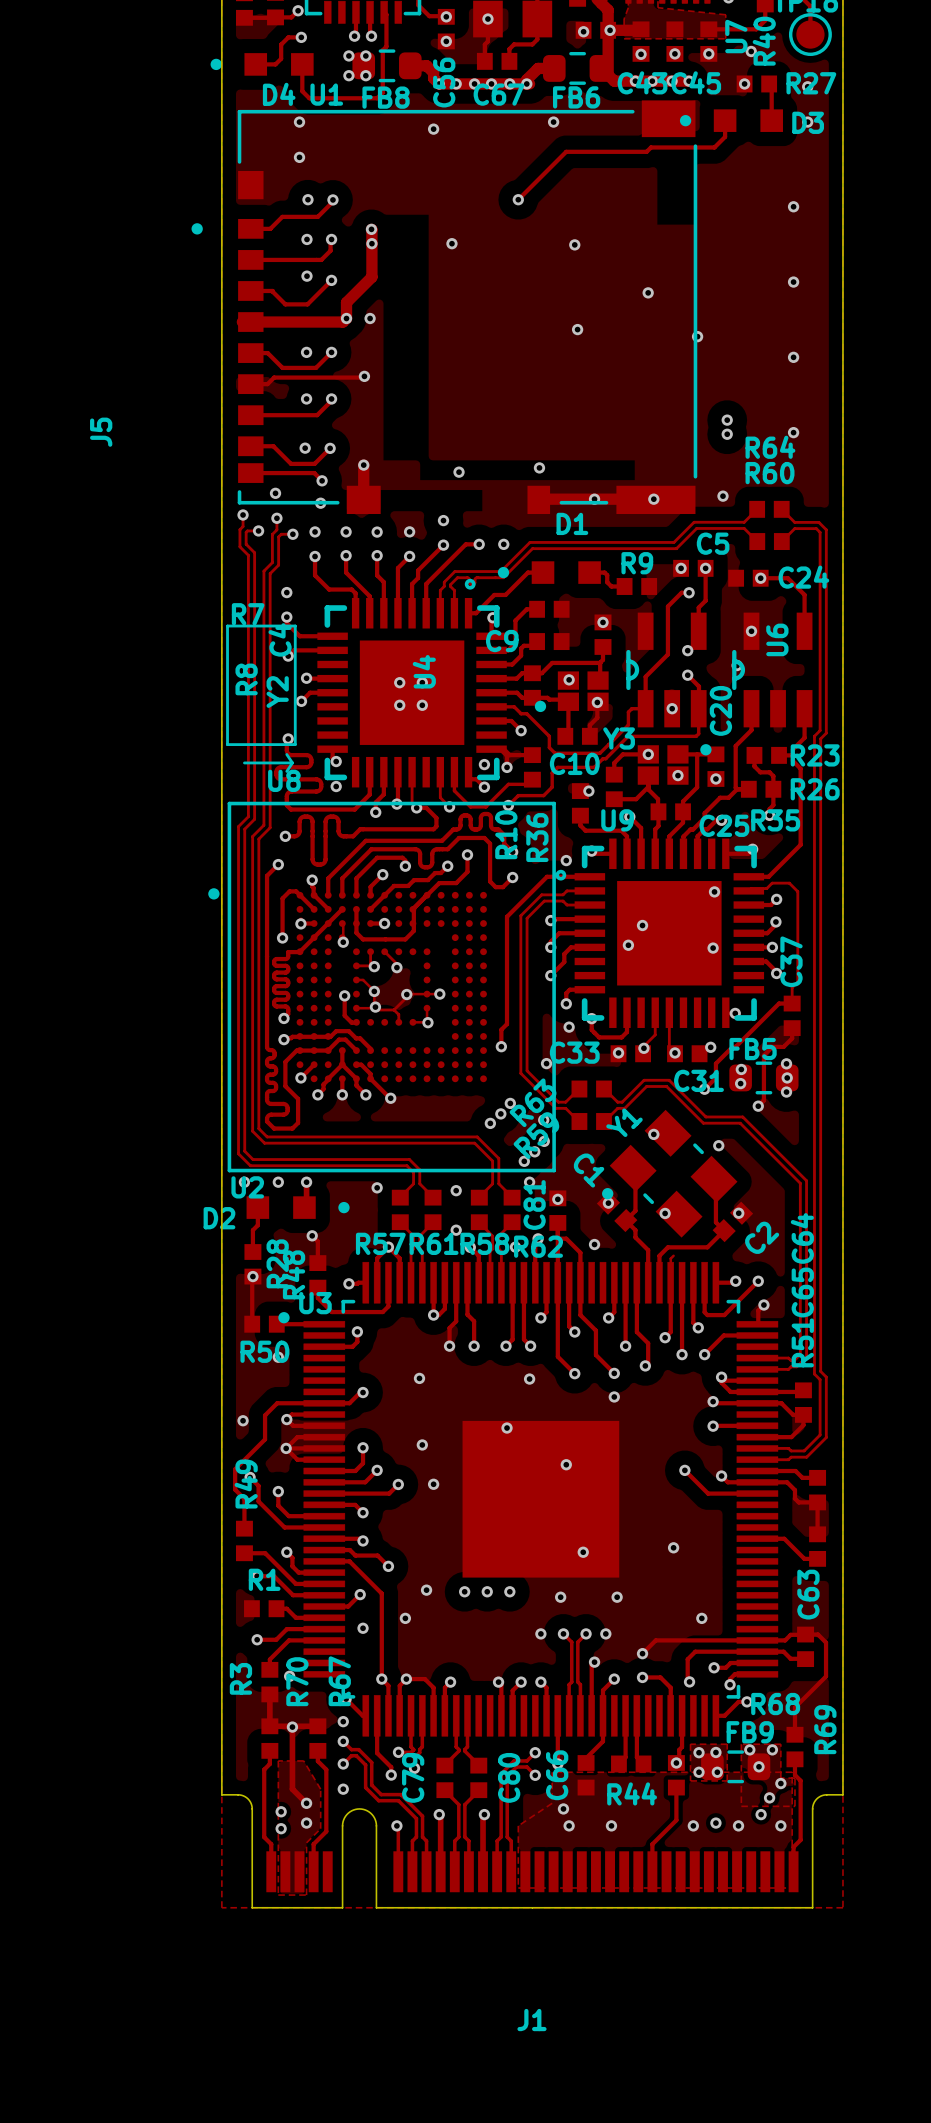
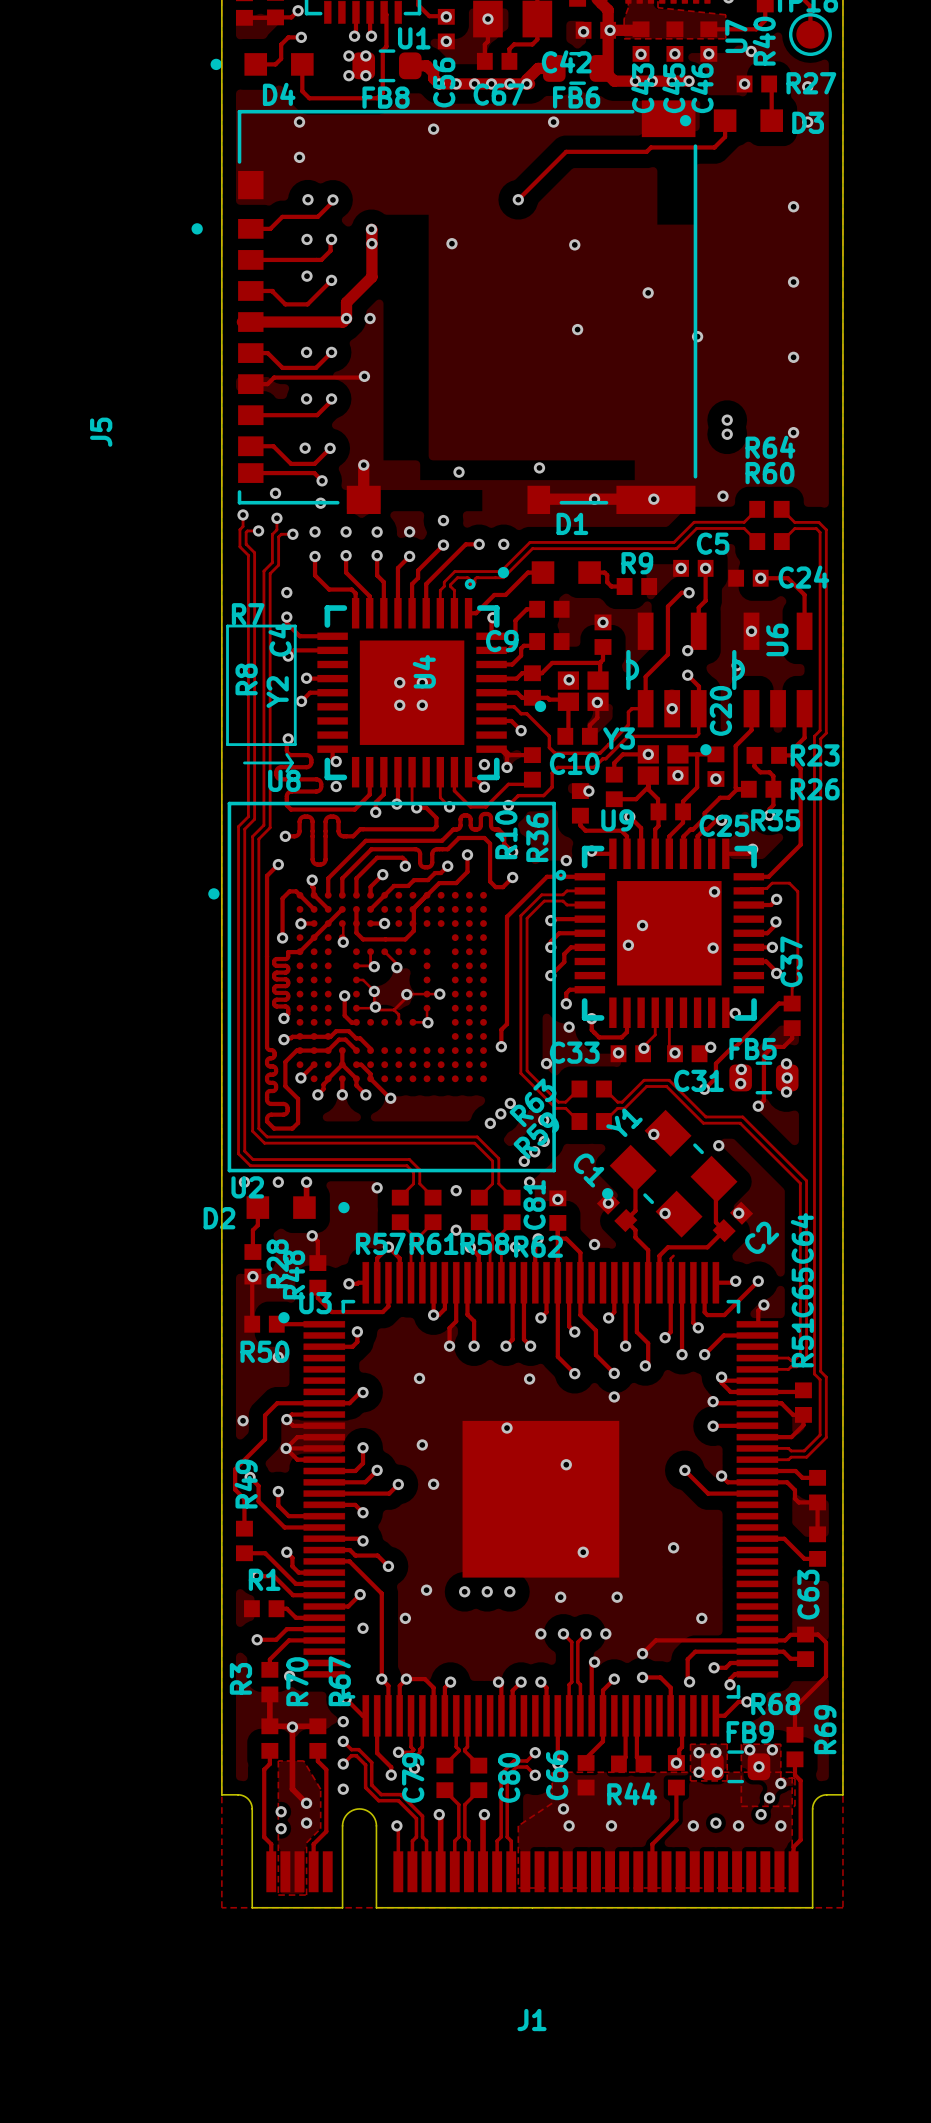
C42 name: none -> C42 (566, 61)
C43 name rotation: 0° (642, 82) -> 90° counterclockwise (642, 88)
C45 name rotation: 0° (696, 82) -> 90° counterclockwise (673, 88)
C46 name: none -> C46 (702, 88)
U1 name position: U1 (326, 94) -> U1 (414, 38)

